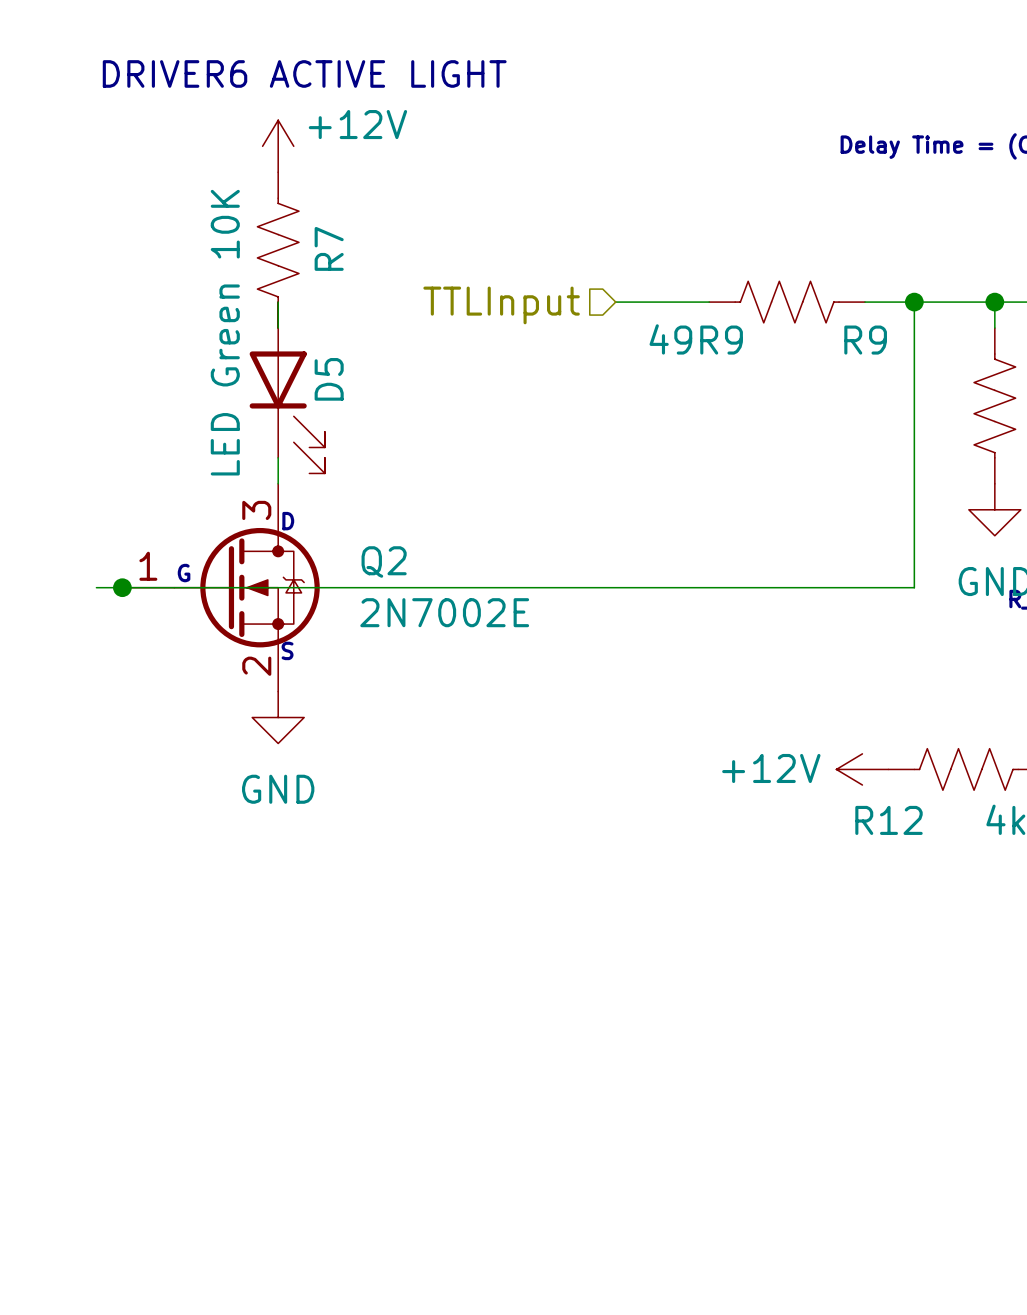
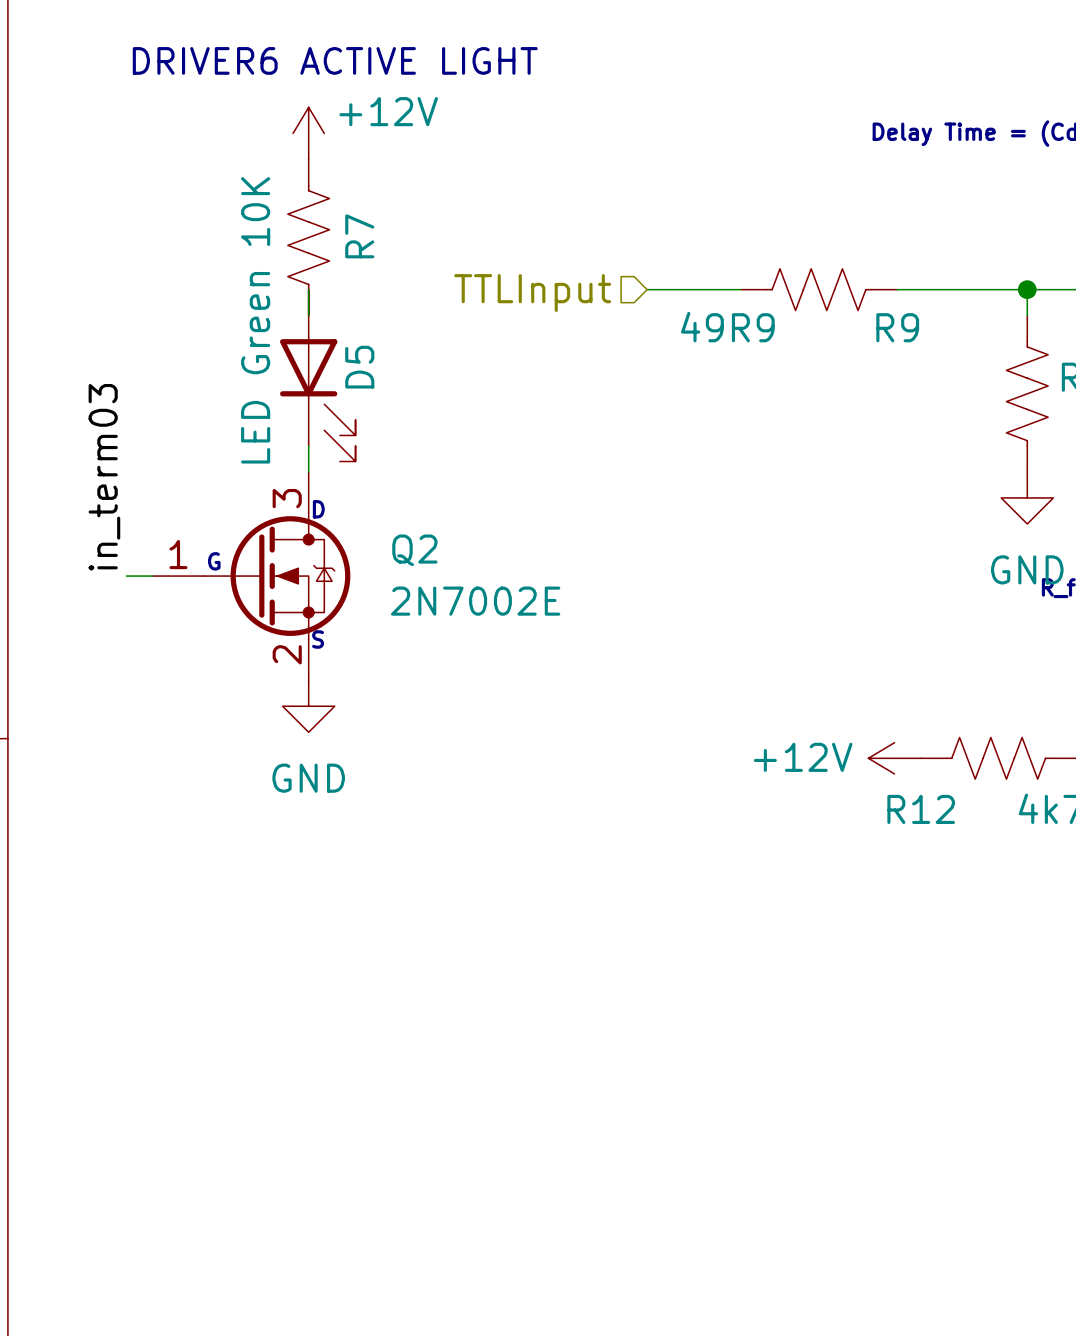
wire: (914, 302) (914, 587) (122, 587) -> none
junction: (914, 302) -> none
label: none -> in_term03 (104, 477)
junction: (122, 587) -> none

